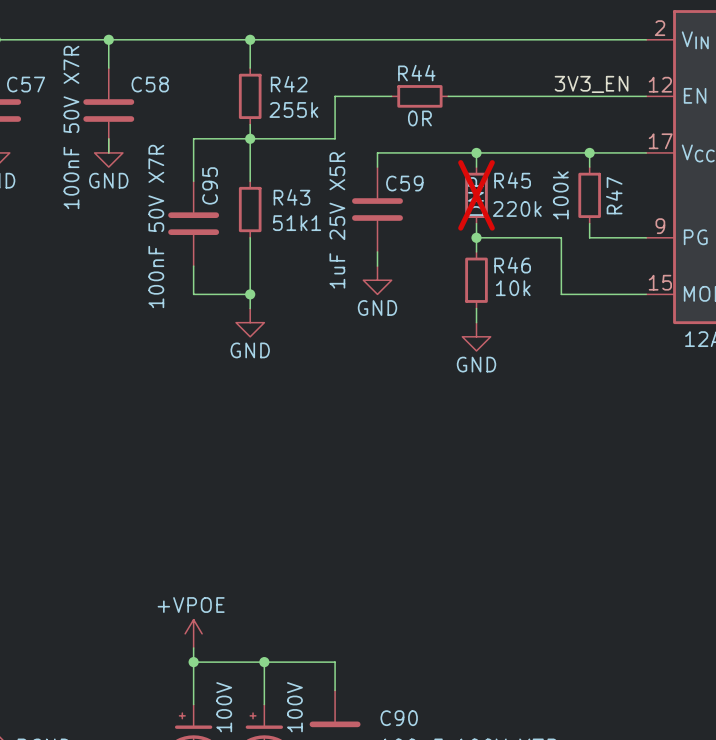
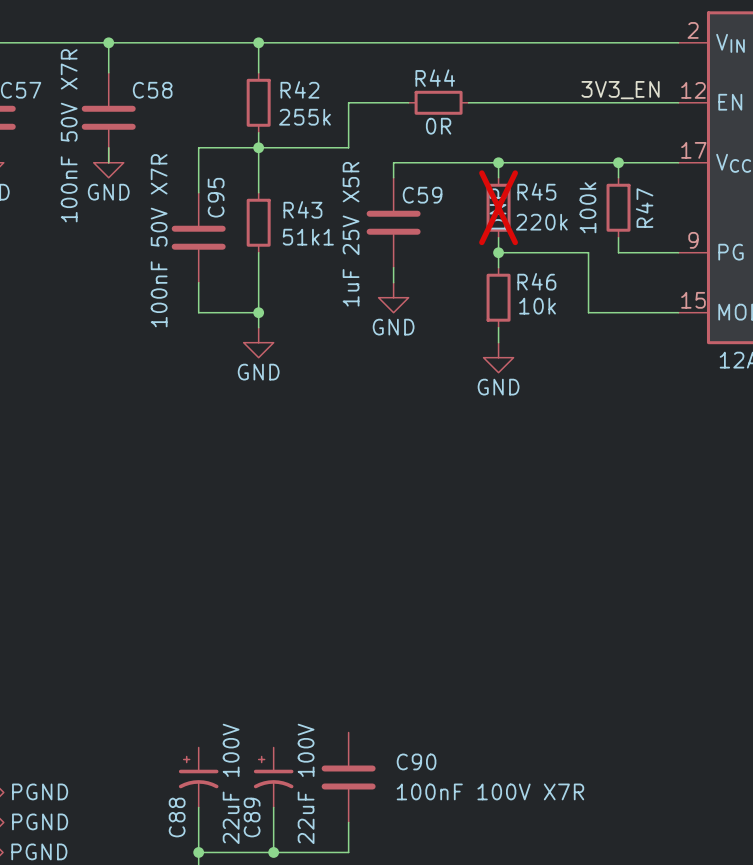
power symbol: +VPOE (193, 633) -> none
wire: (193, 647) (193, 704) -> none
wire: (193, 662) (335, 662) (335, 690) -> none
junction: (193, 662) -> none
wire: (264, 662) (264, 704) -> none
junction: (264, 662) -> none

